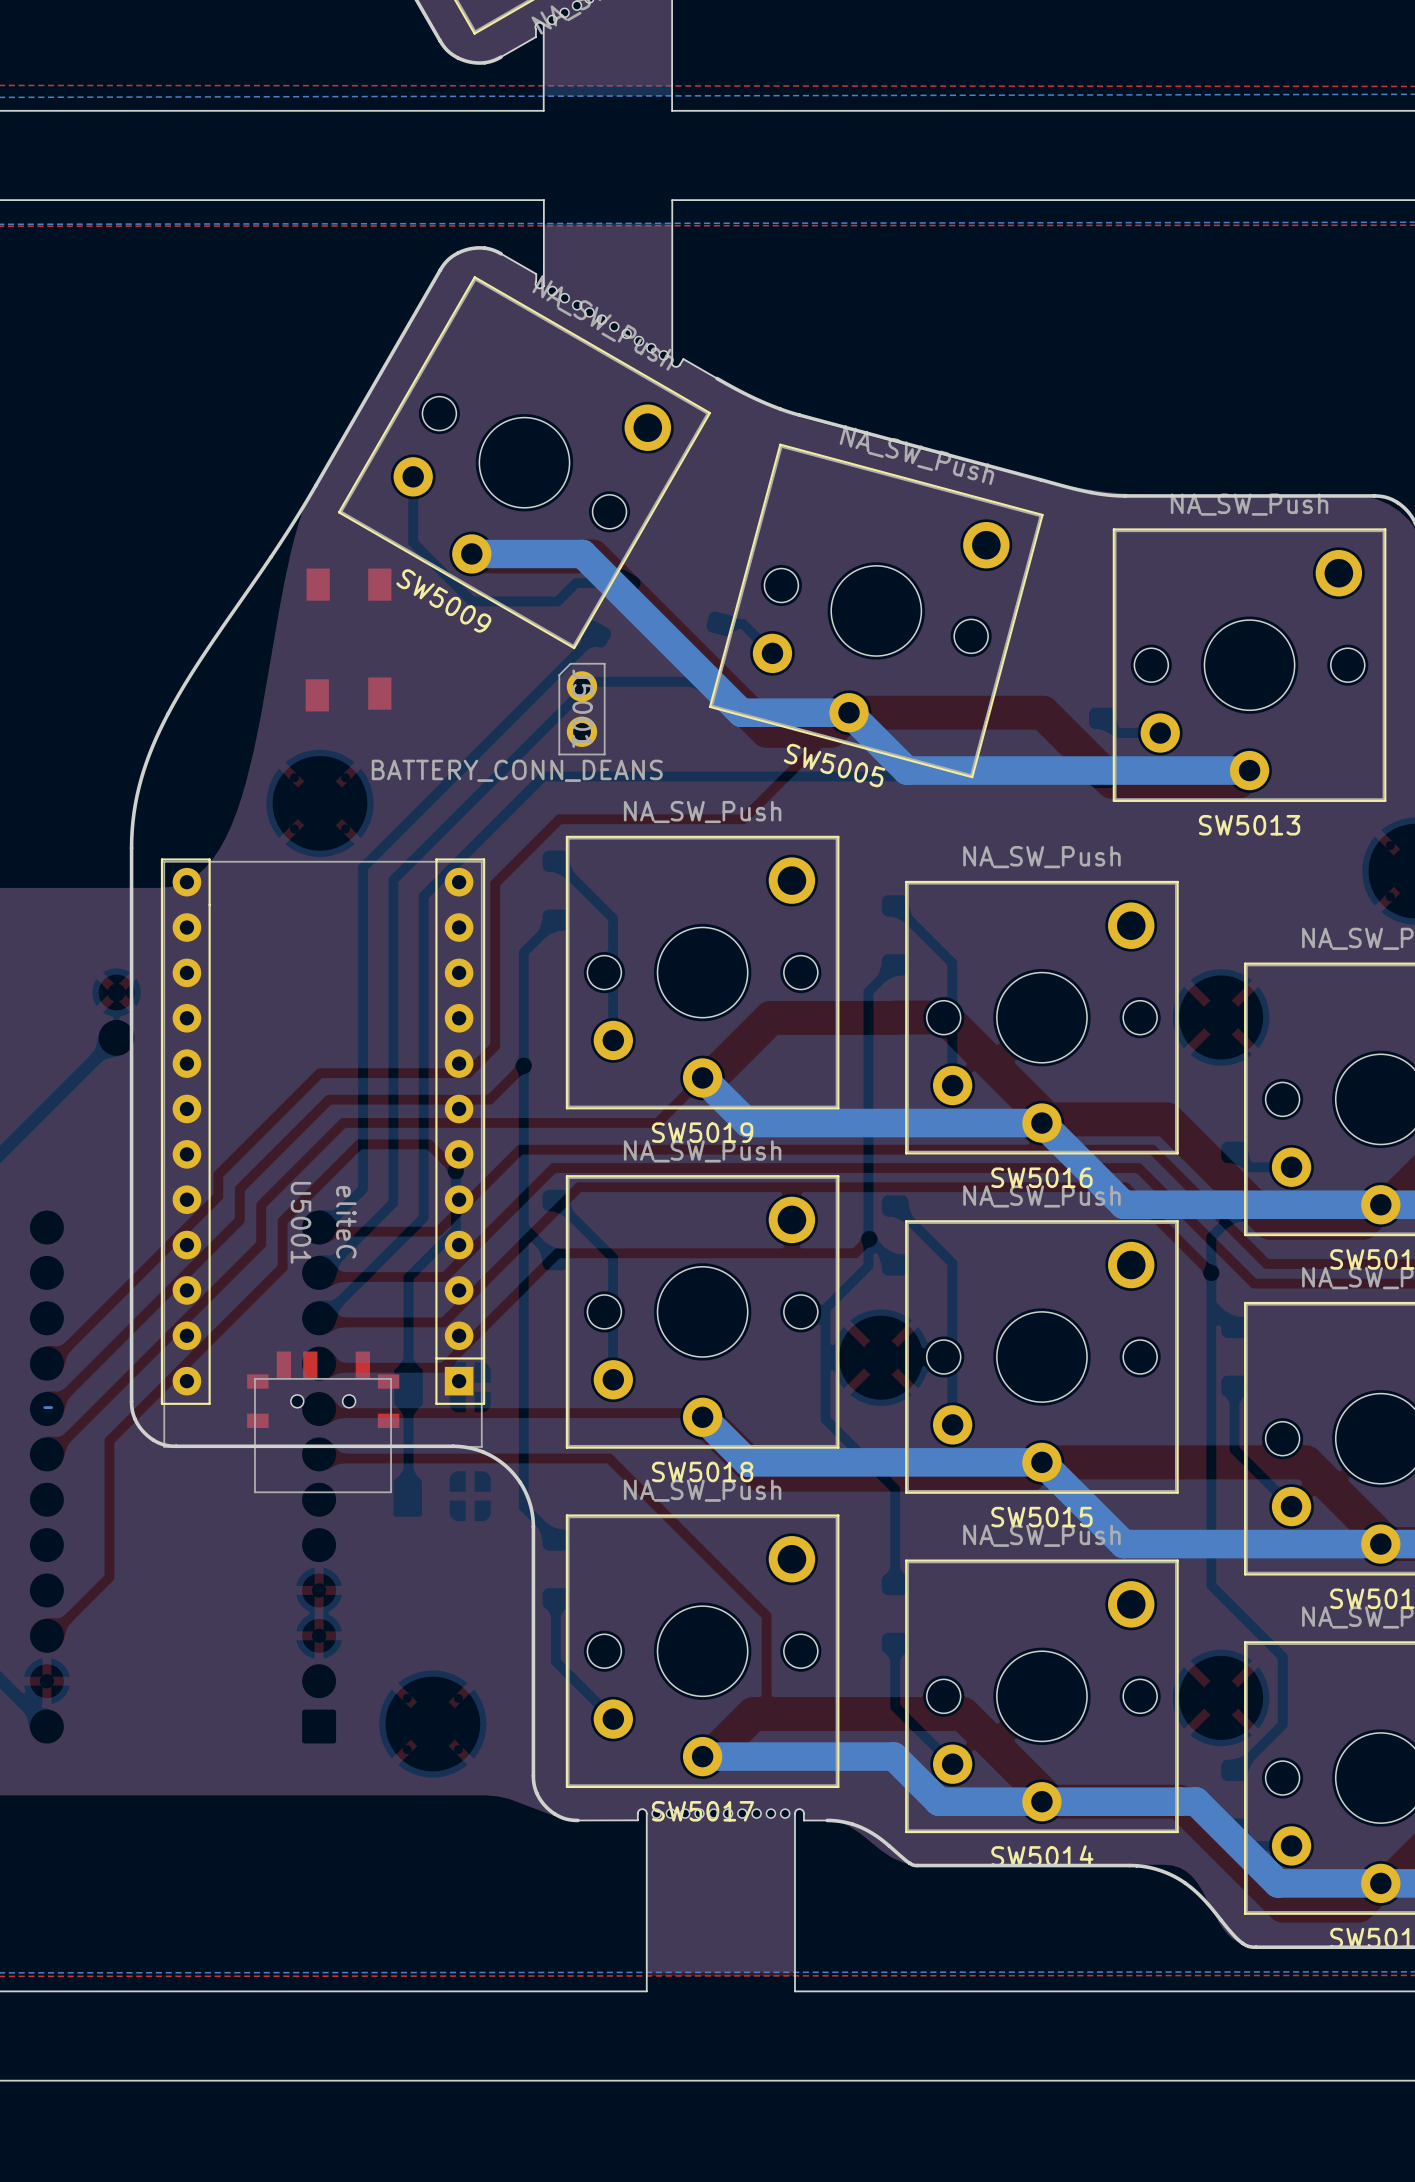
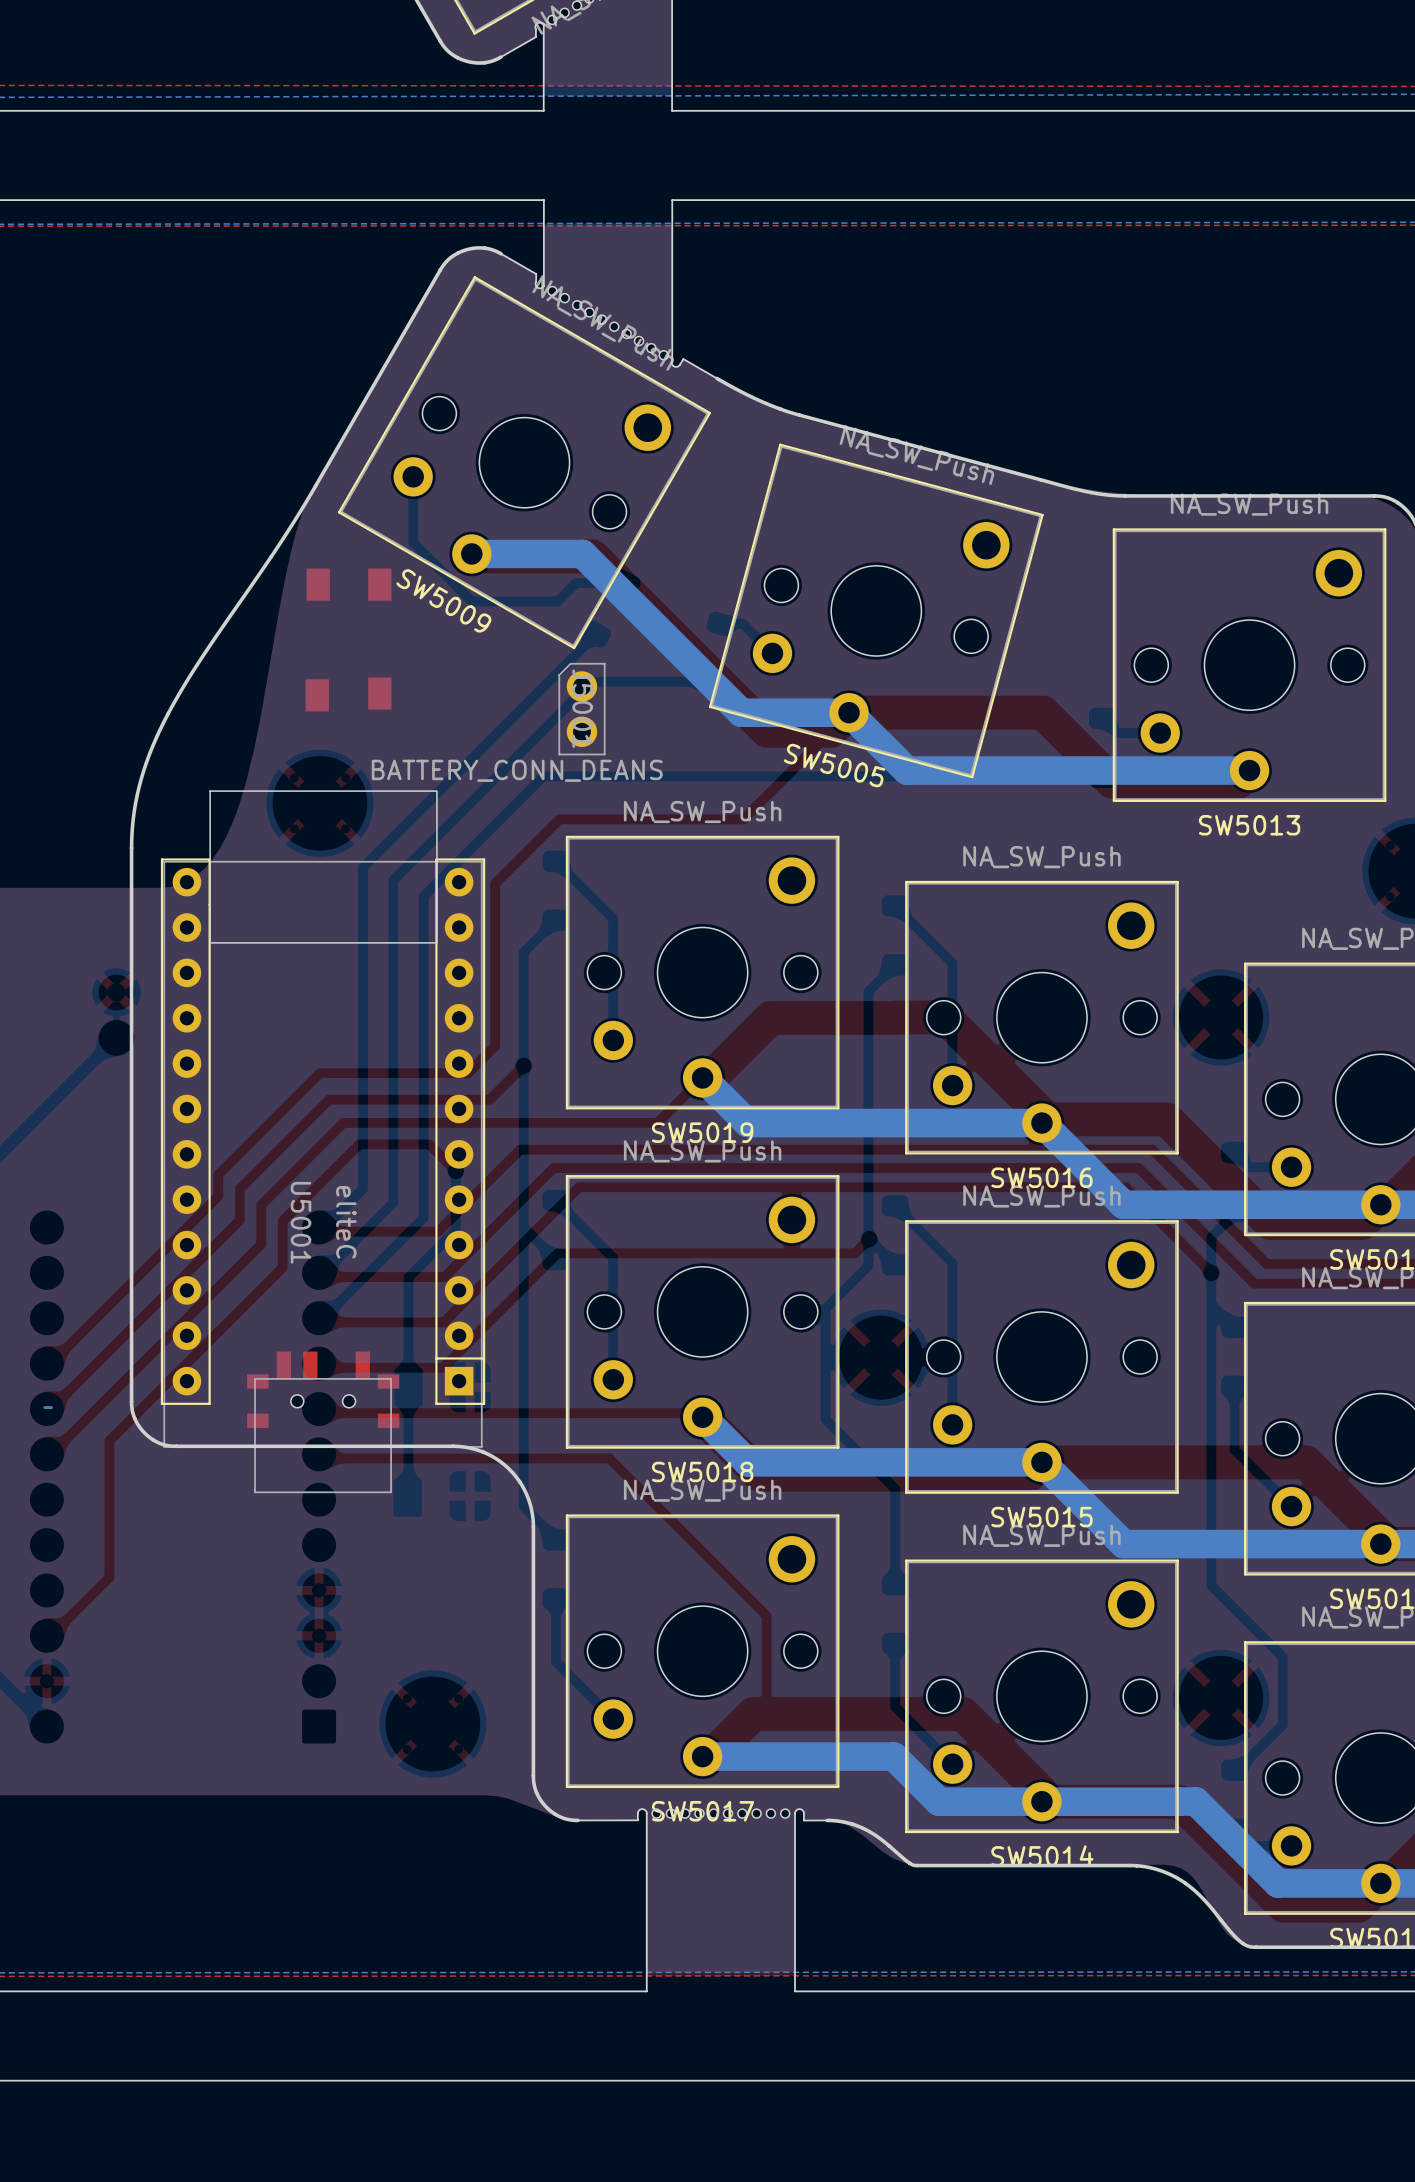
U5001 footprint: [160, 858, 486, 1494] -> [160, 790, 486, 1494]

